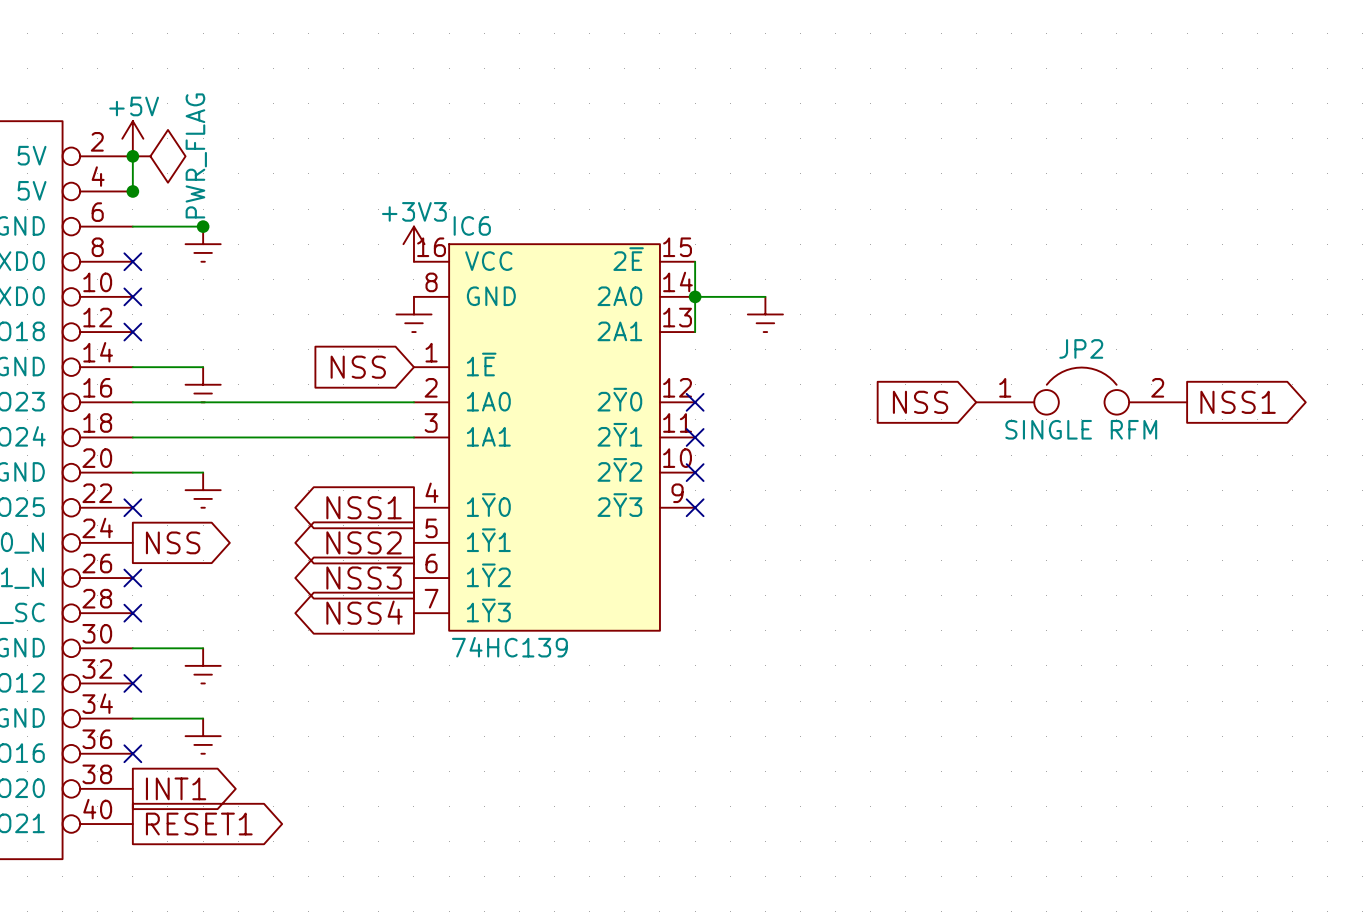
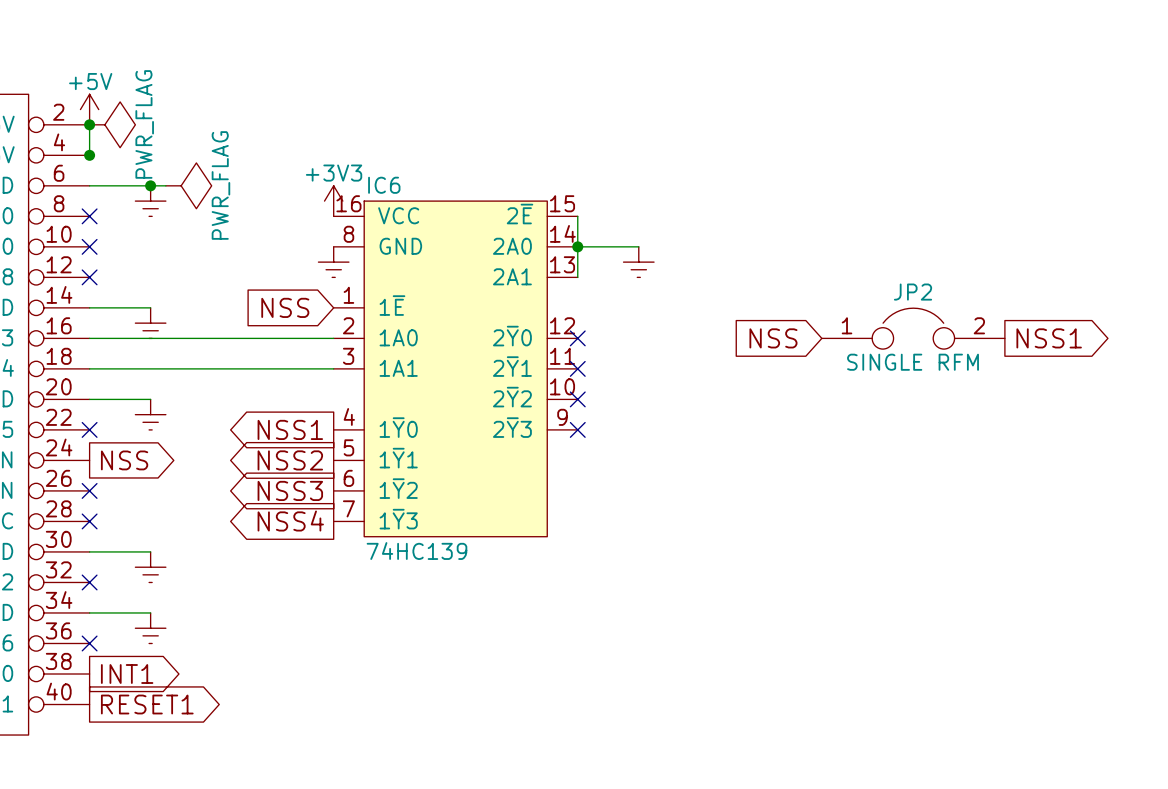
wire: none -> (150, 185) (165, 185)
power symbol: none -> PWR_FLAG (188, 185)

